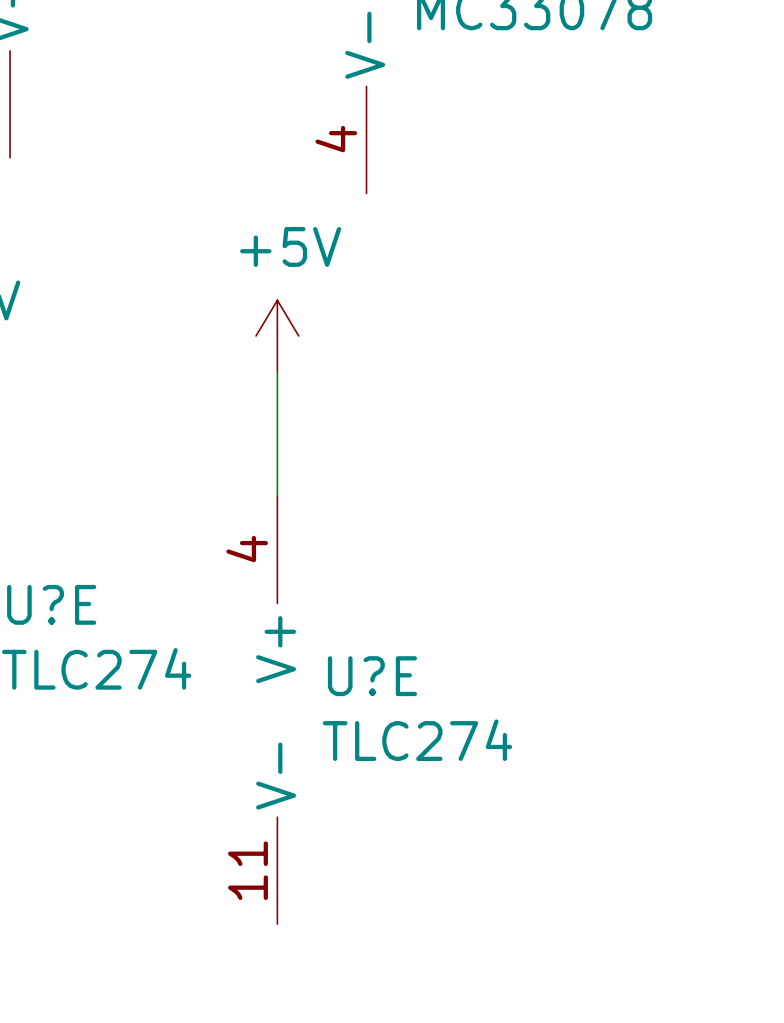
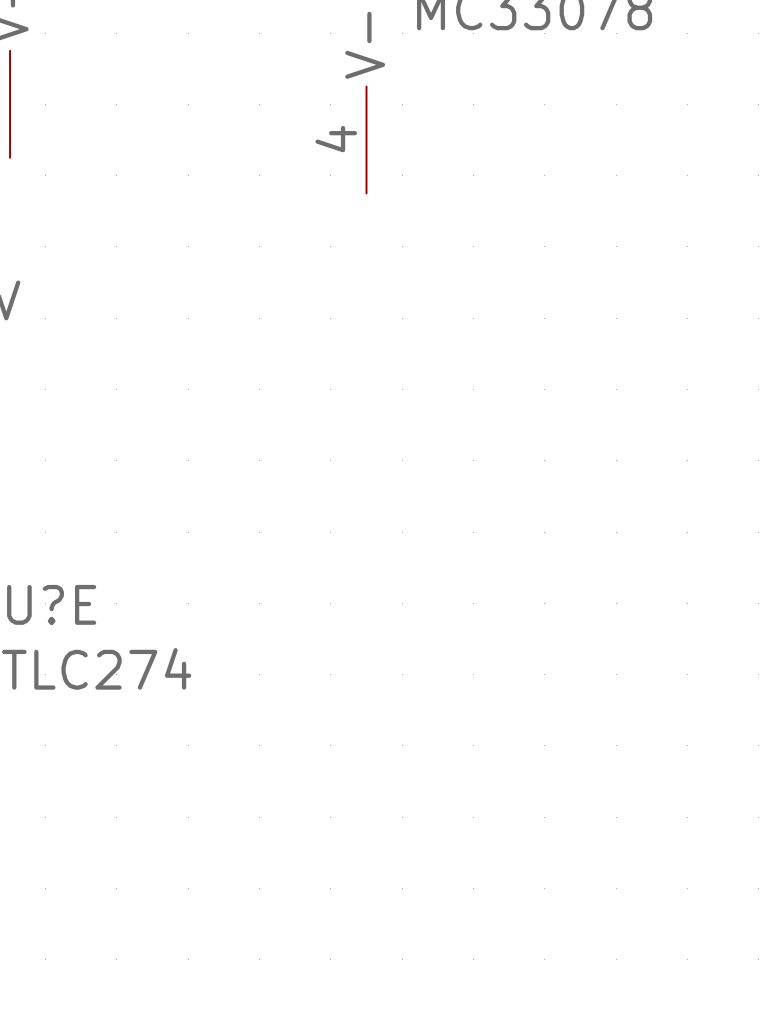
power symbol: +5V (277, 336) -> none
wire: (277, 371) (277, 496) -> none
U?E: TLC274 (277, 710) -> none

